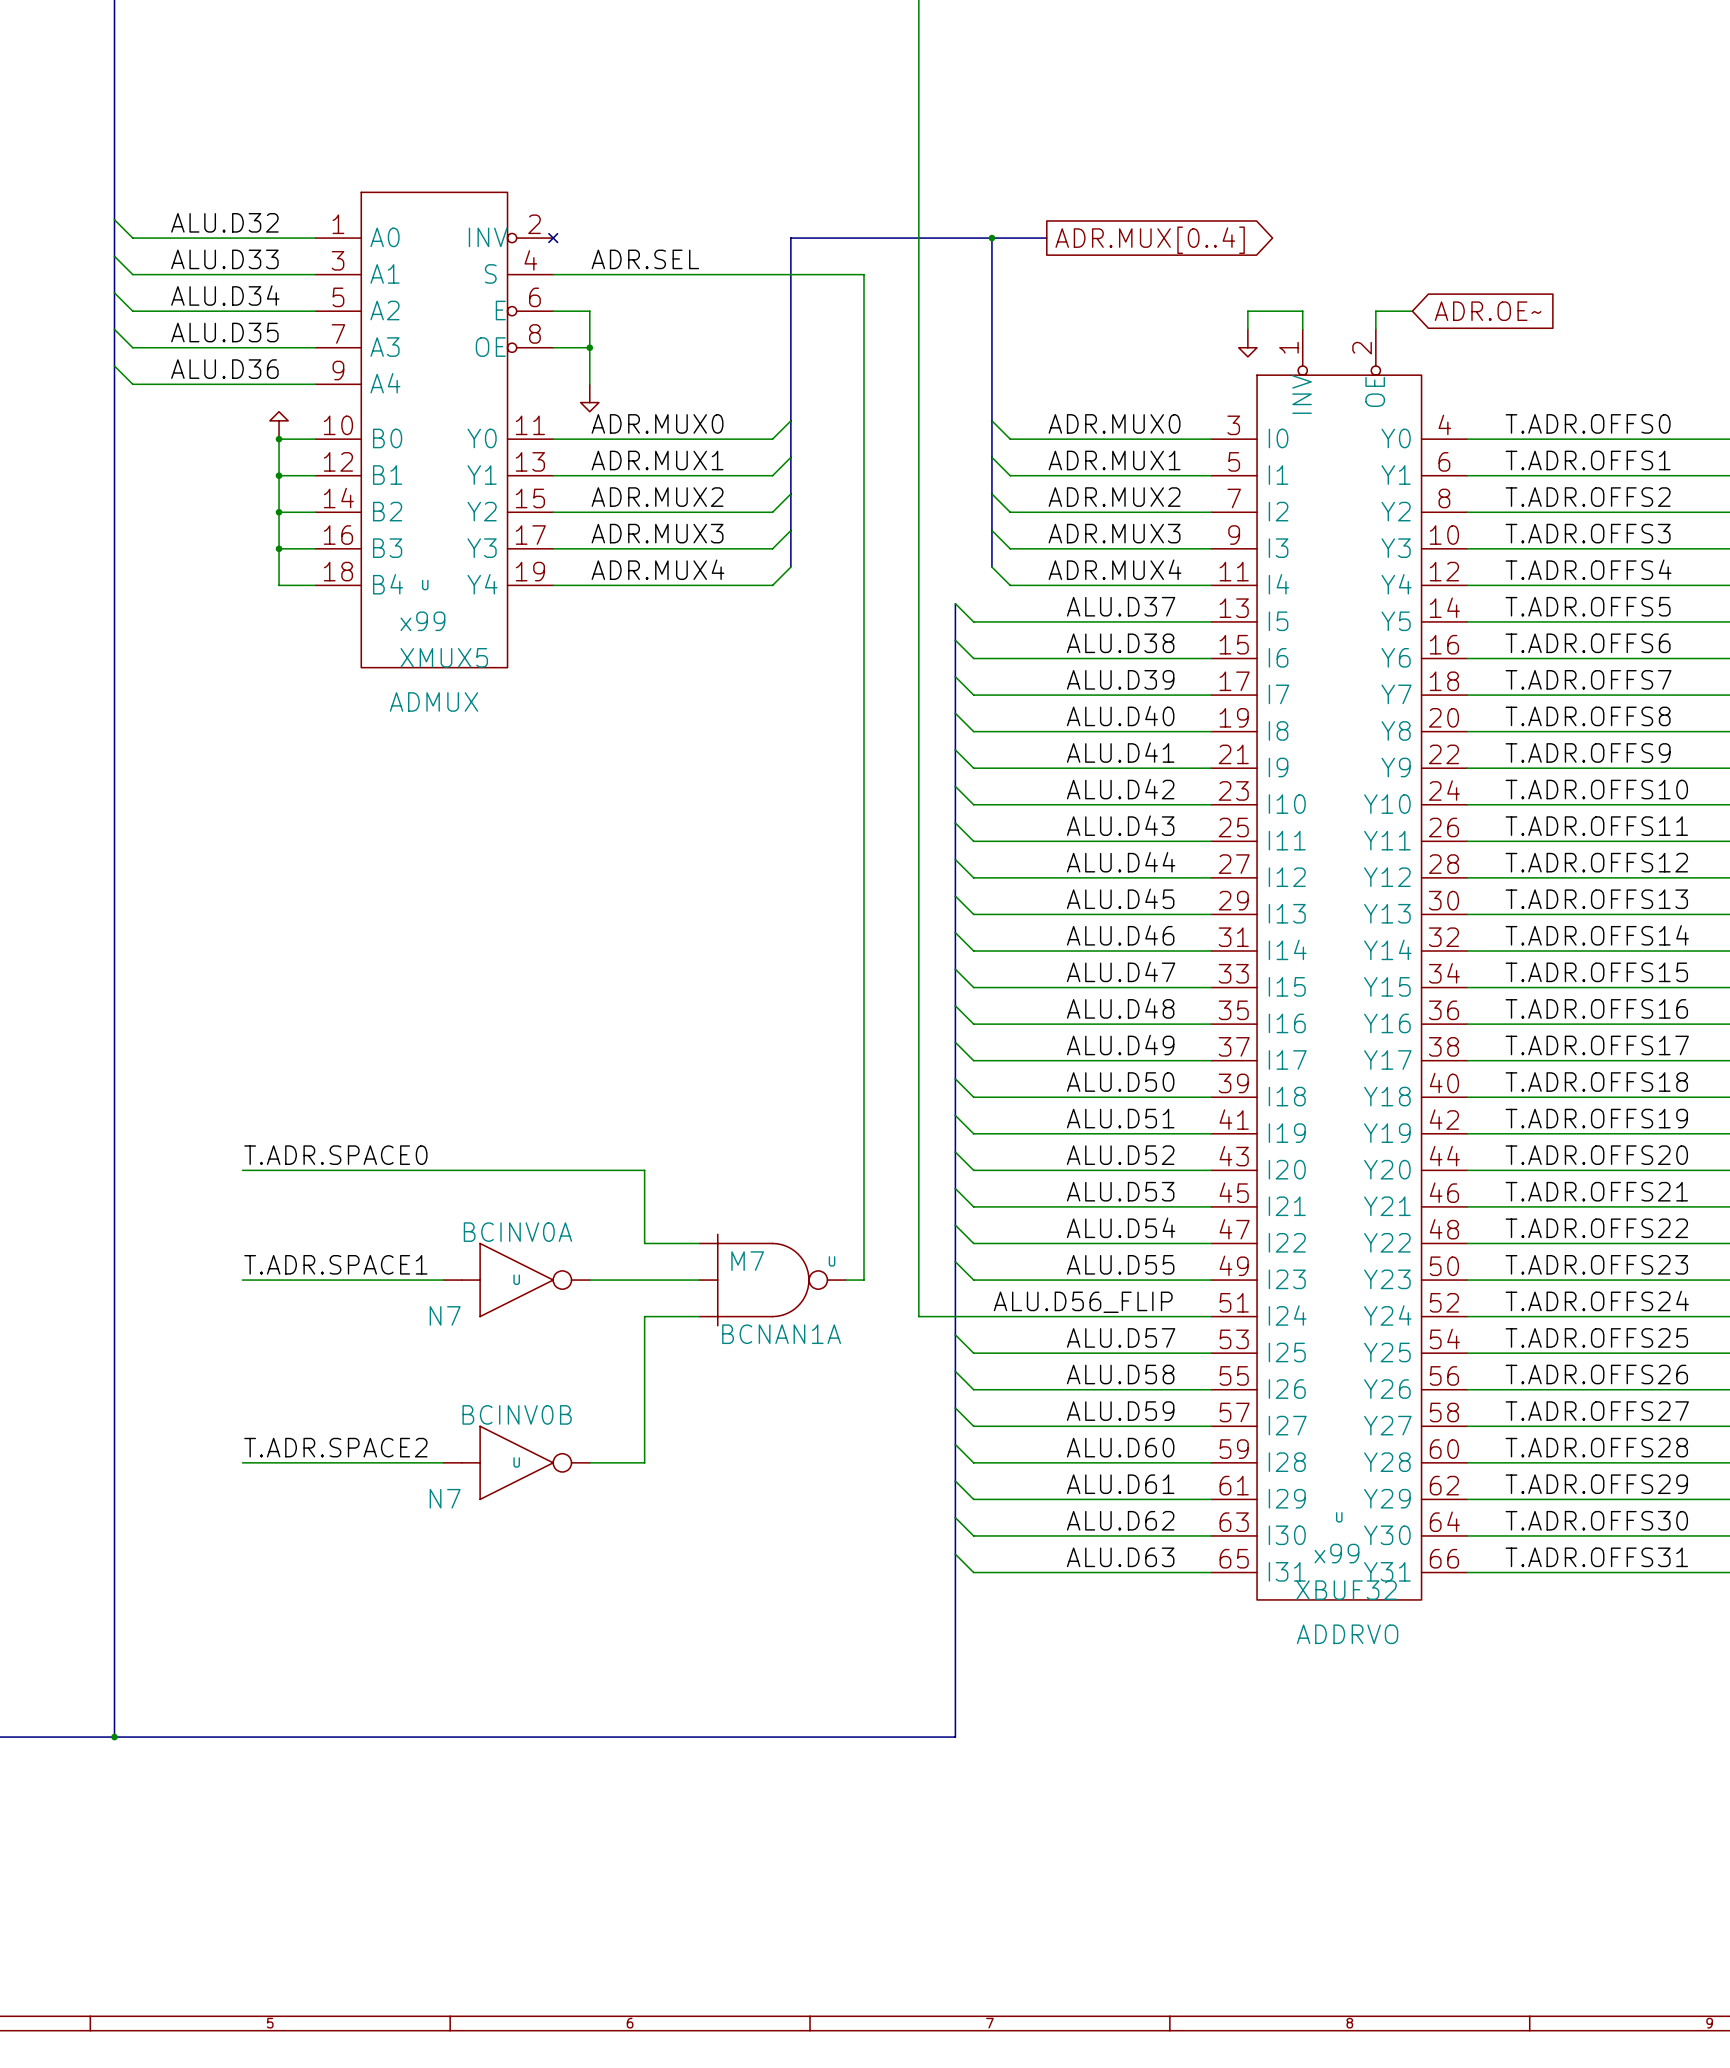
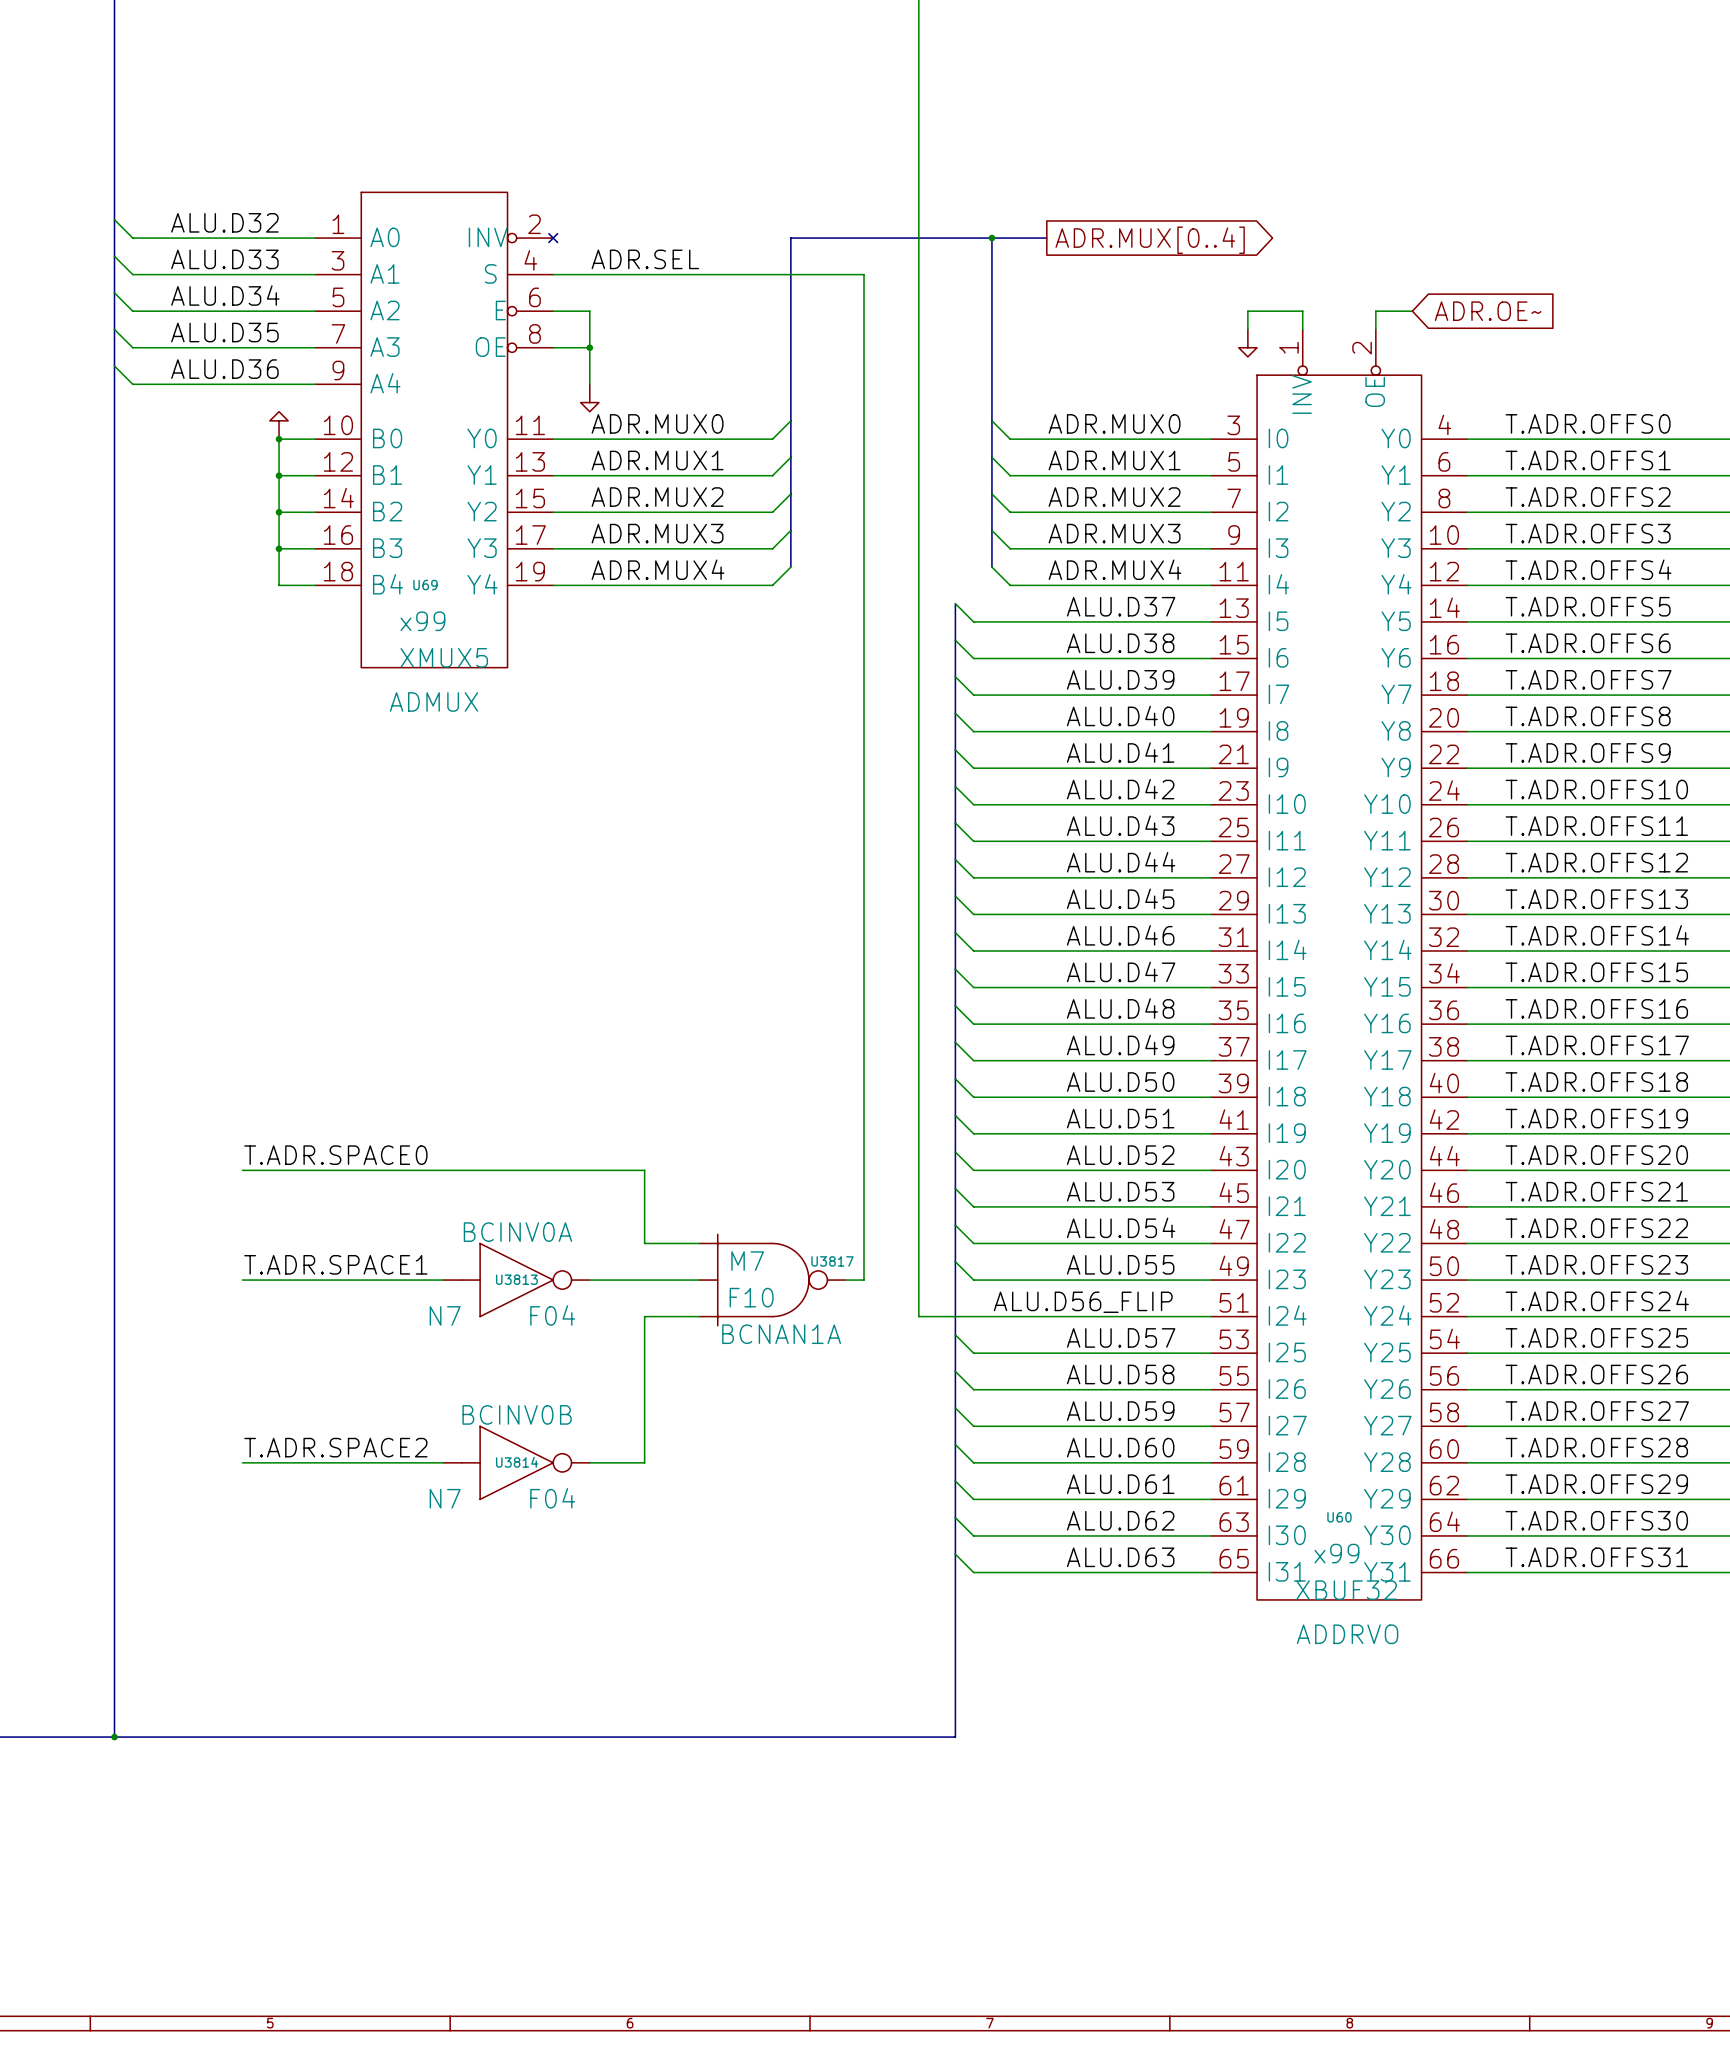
U name: U (425, 585) -> U69 (425, 585)
U name: U (832, 1261) -> U3817 (832, 1261)
U name: U (516, 1279) -> U3813 (516, 1279)
U value: none -> F10 (751, 1297)
U value: none -> F04 (552, 1315)
U name: U (516, 1462) -> U3814 (517, 1462)
U value: none -> F04 (552, 1498)
U name: U (1339, 1517) -> U60 (1339, 1517)

